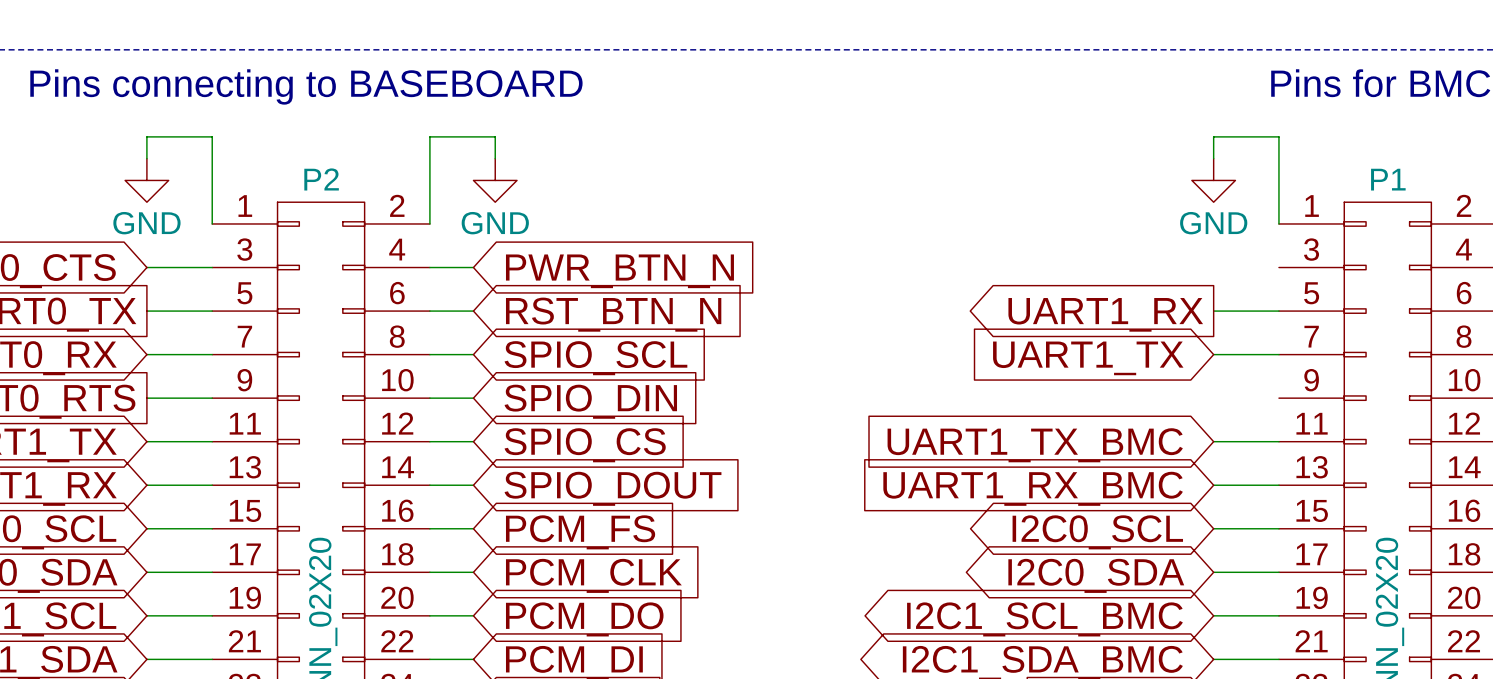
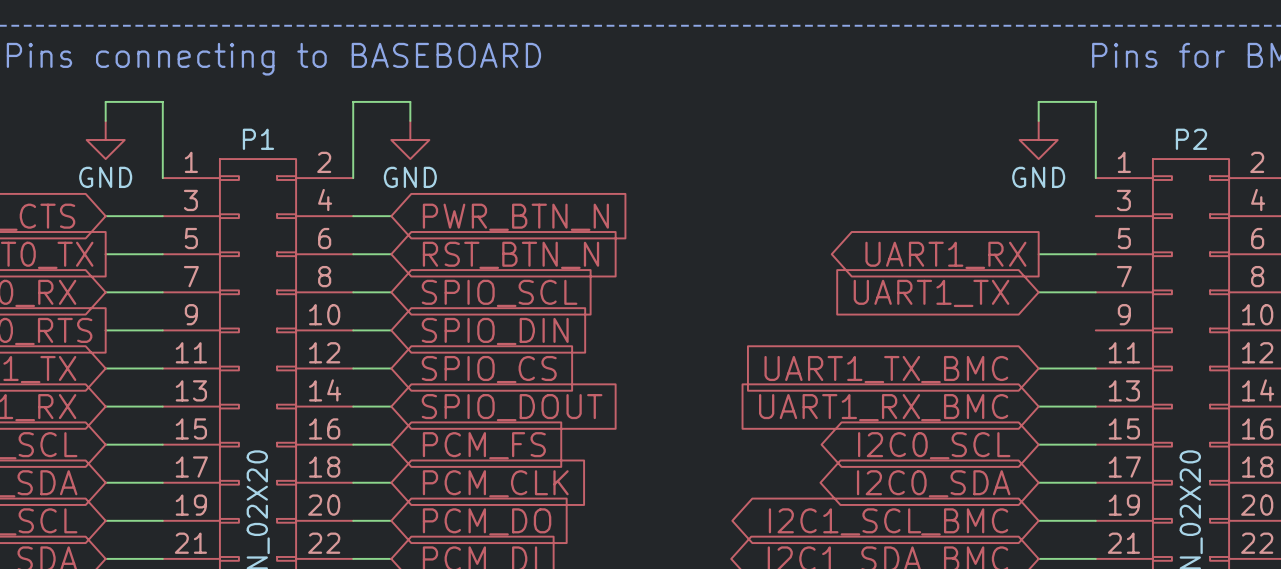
P2 name: P2 (321, 179) -> P1 (258, 139)
P1 name: P1 (1388, 179) -> P2 (1191, 139)

